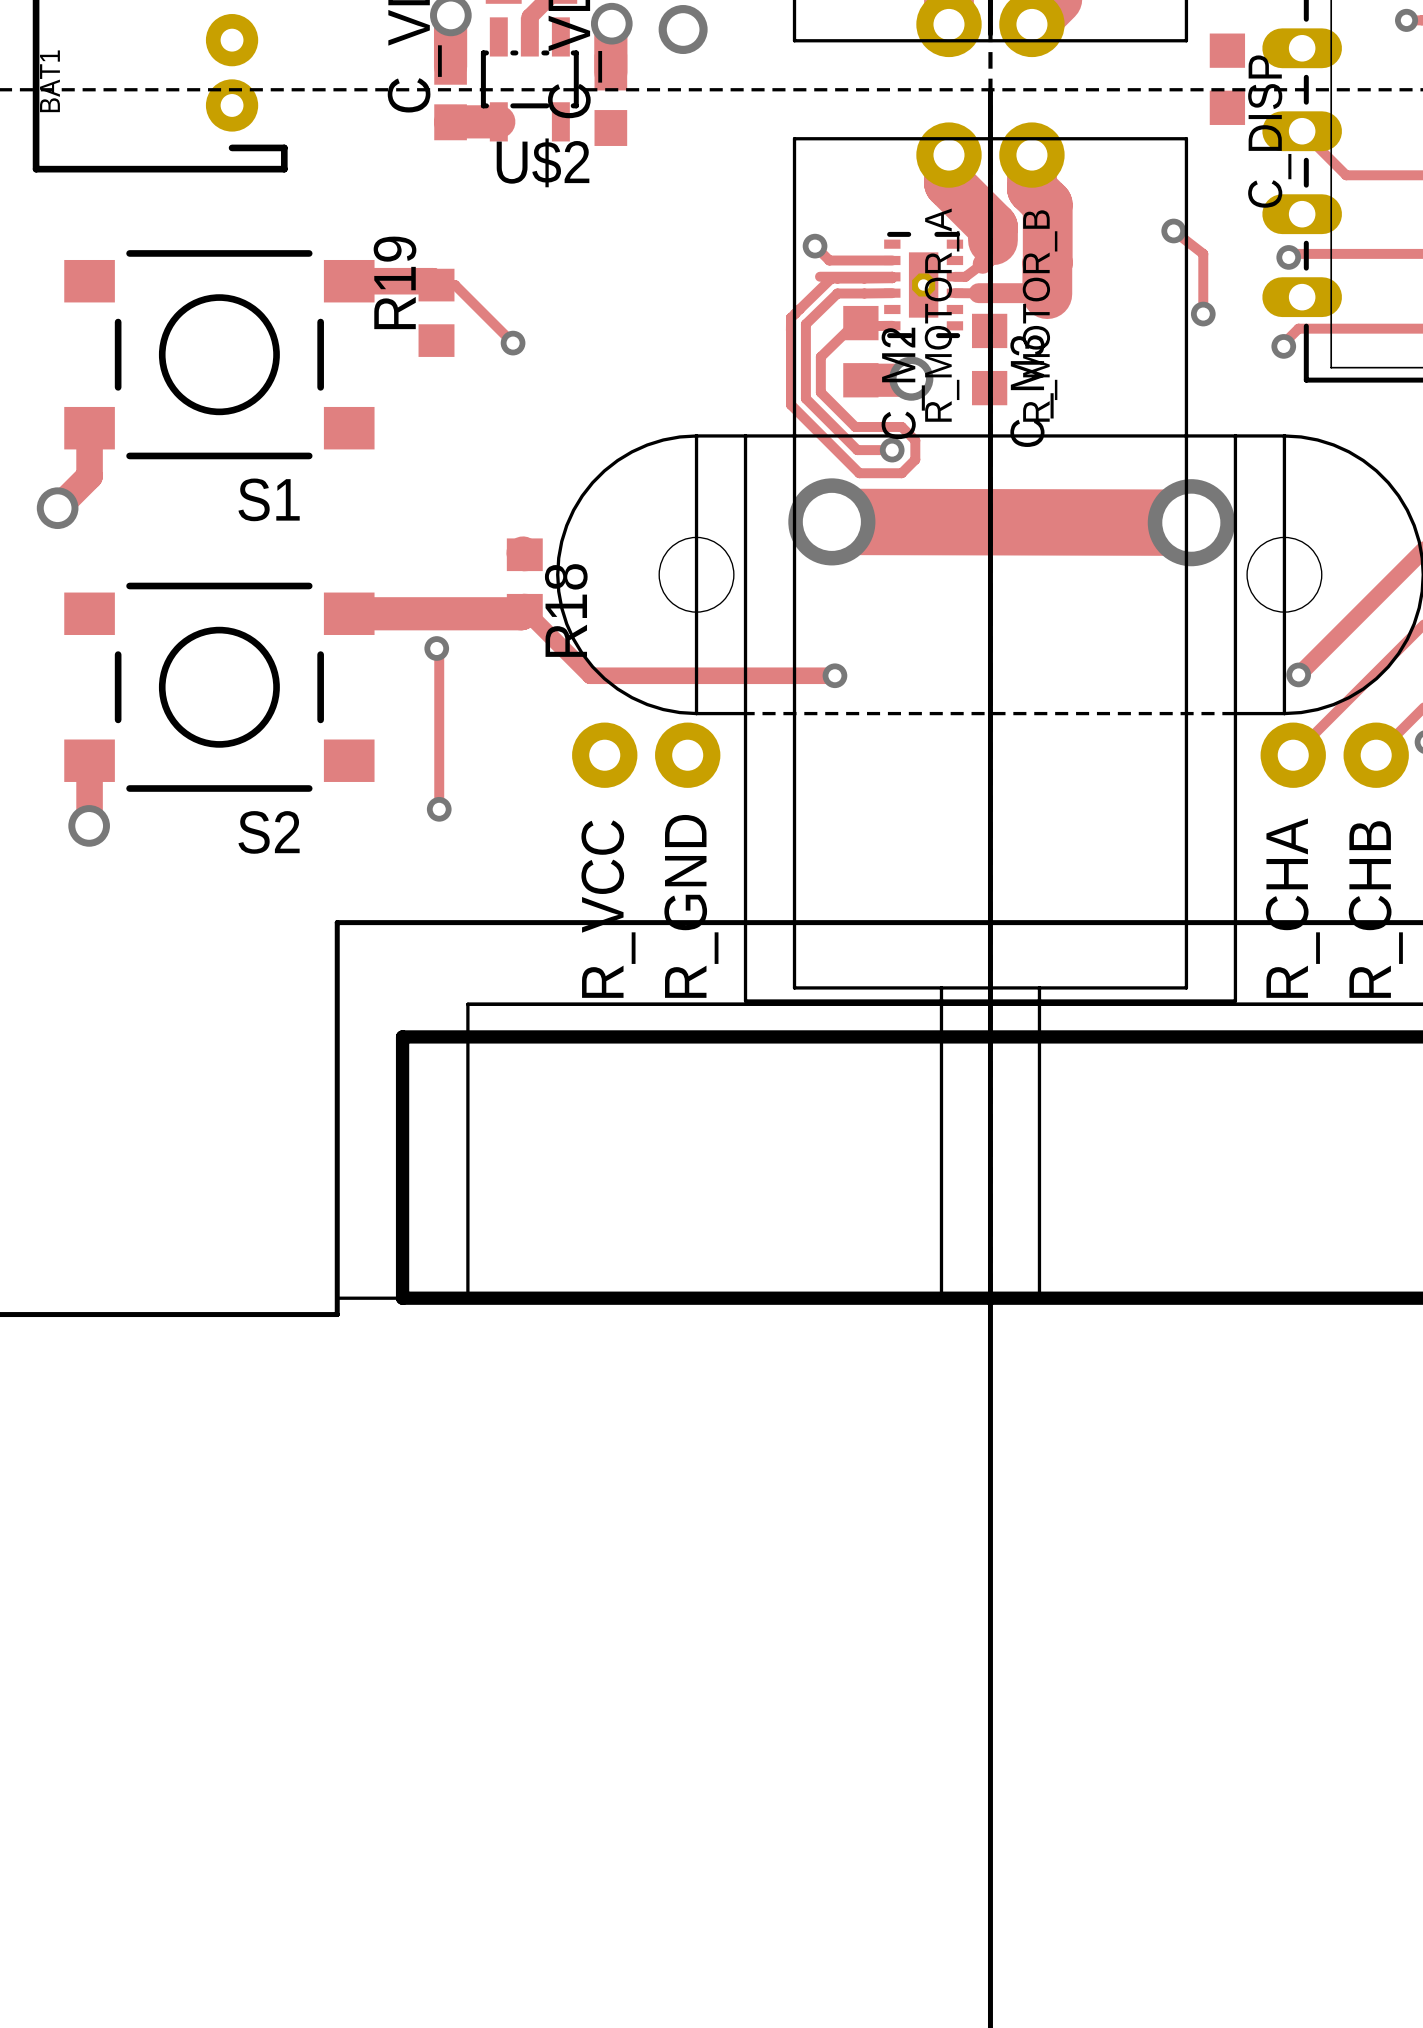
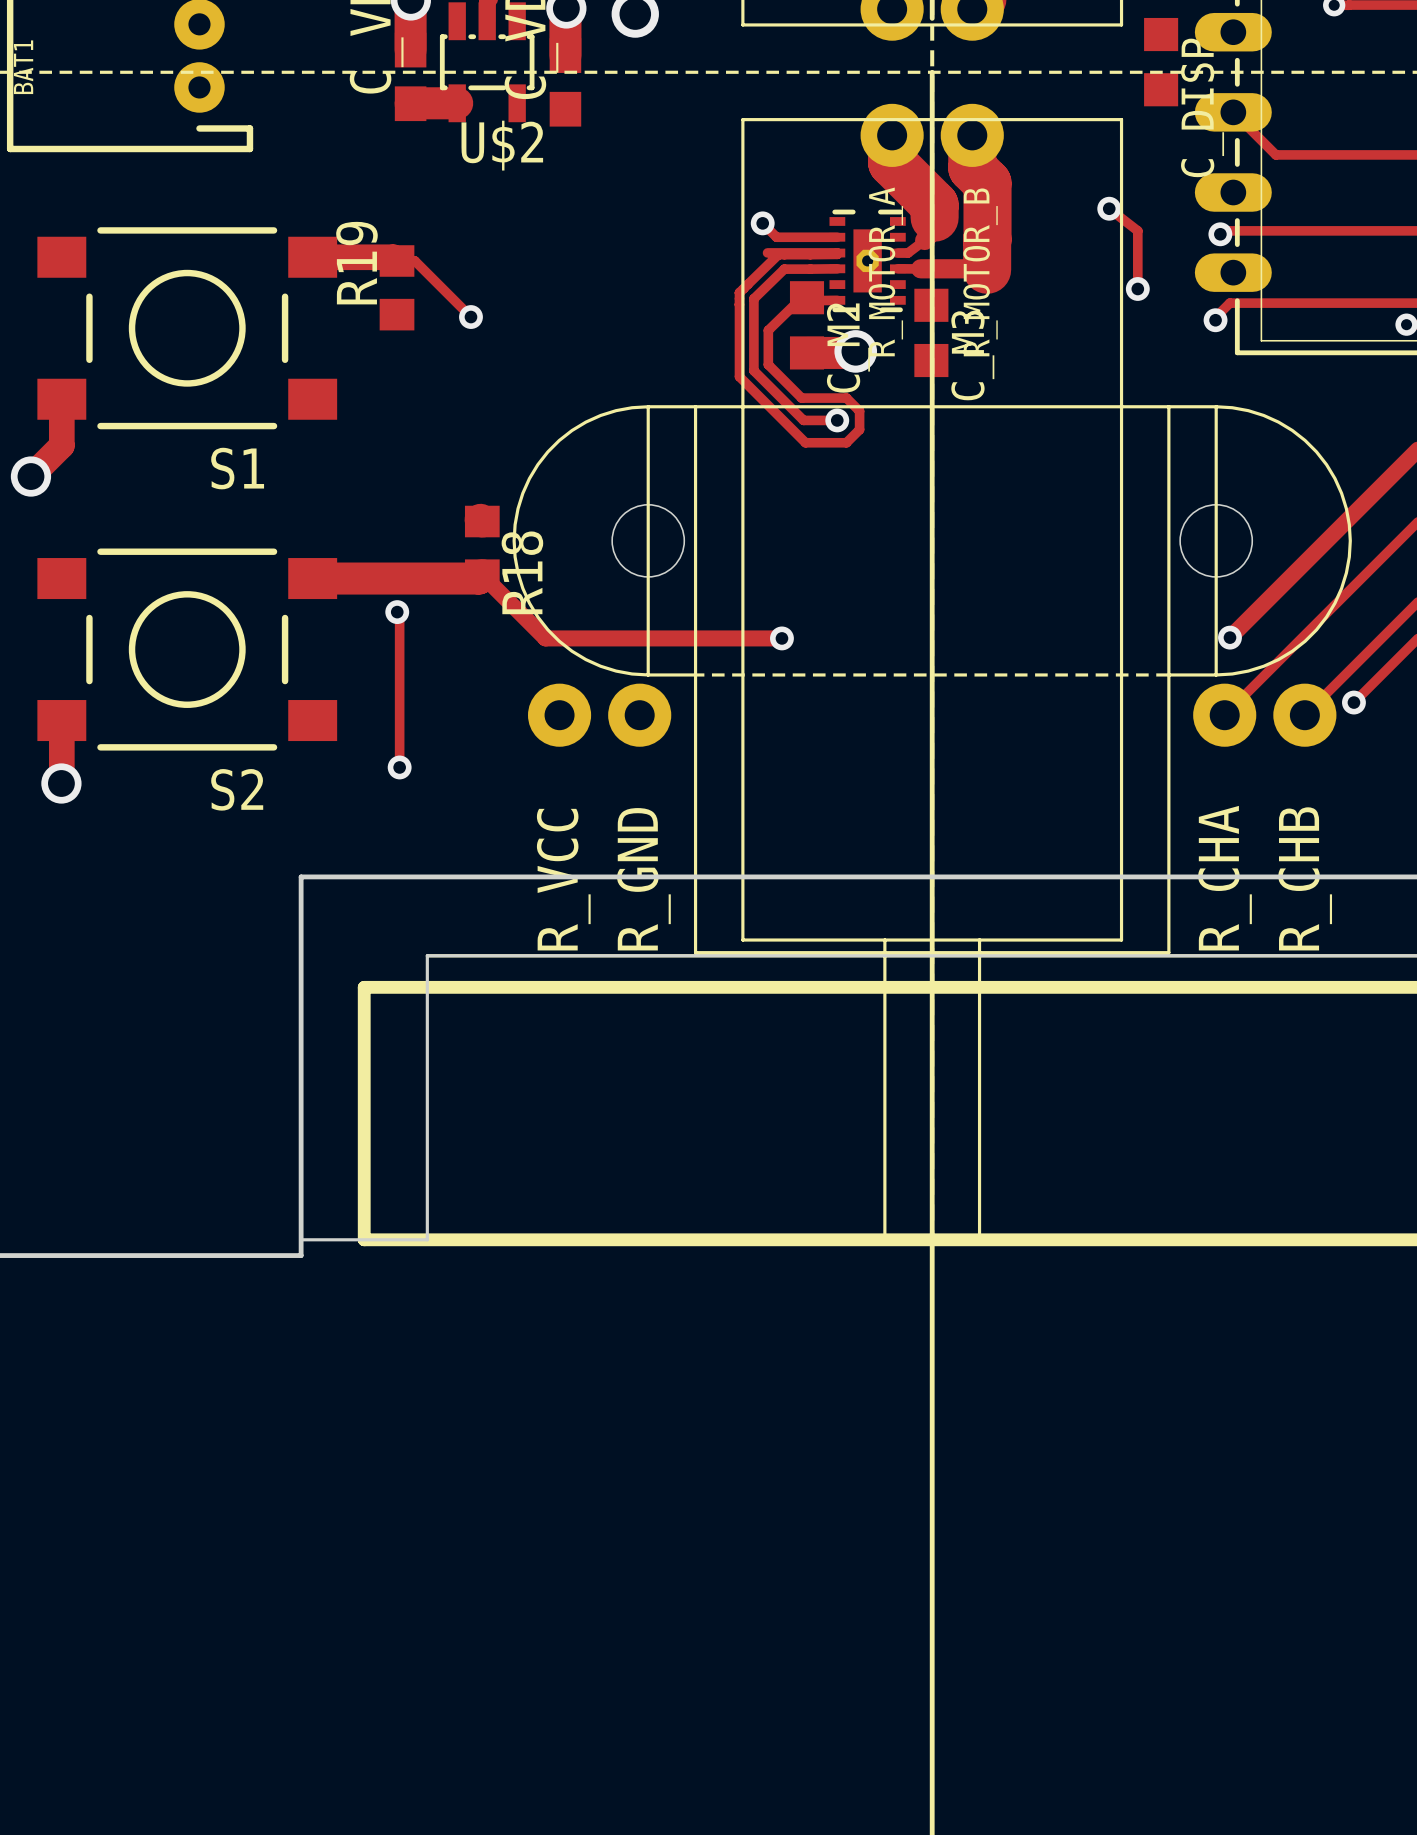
track: (831, 521) (1191, 522) -> none
via: (831, 521) -> none
via: (1191, 522) -> none

